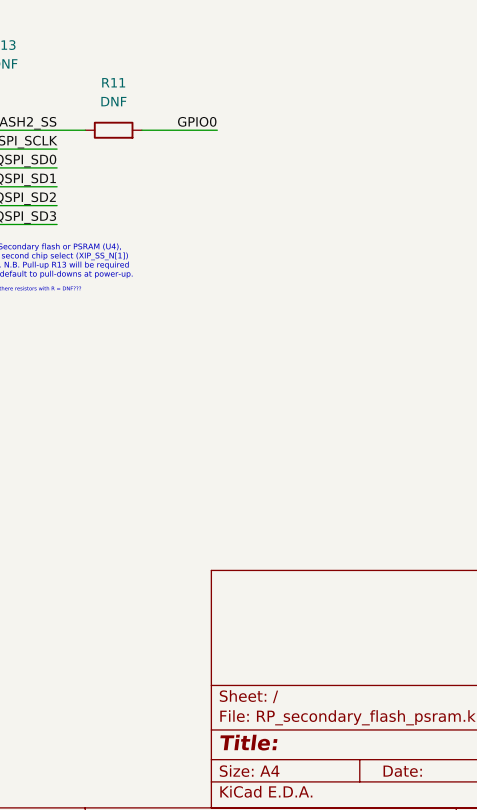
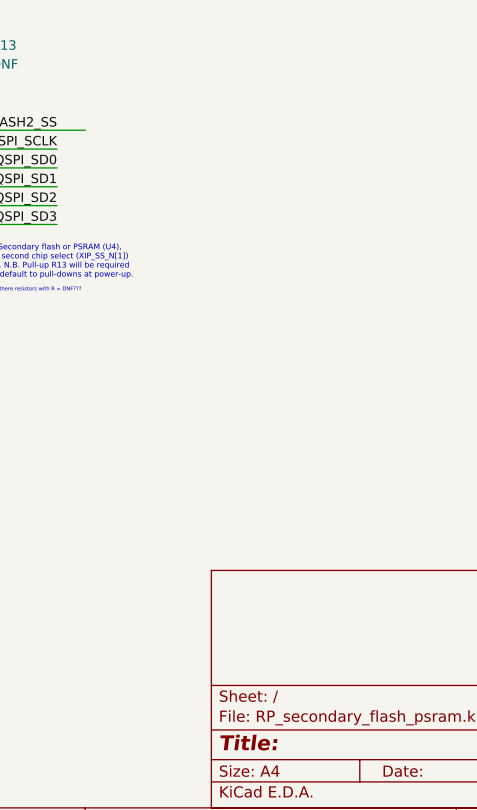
label: GPIO0 (197, 121) -> none
R11: DNF (113, 130) -> none
wire: (141, 130) (217, 130) -> none

